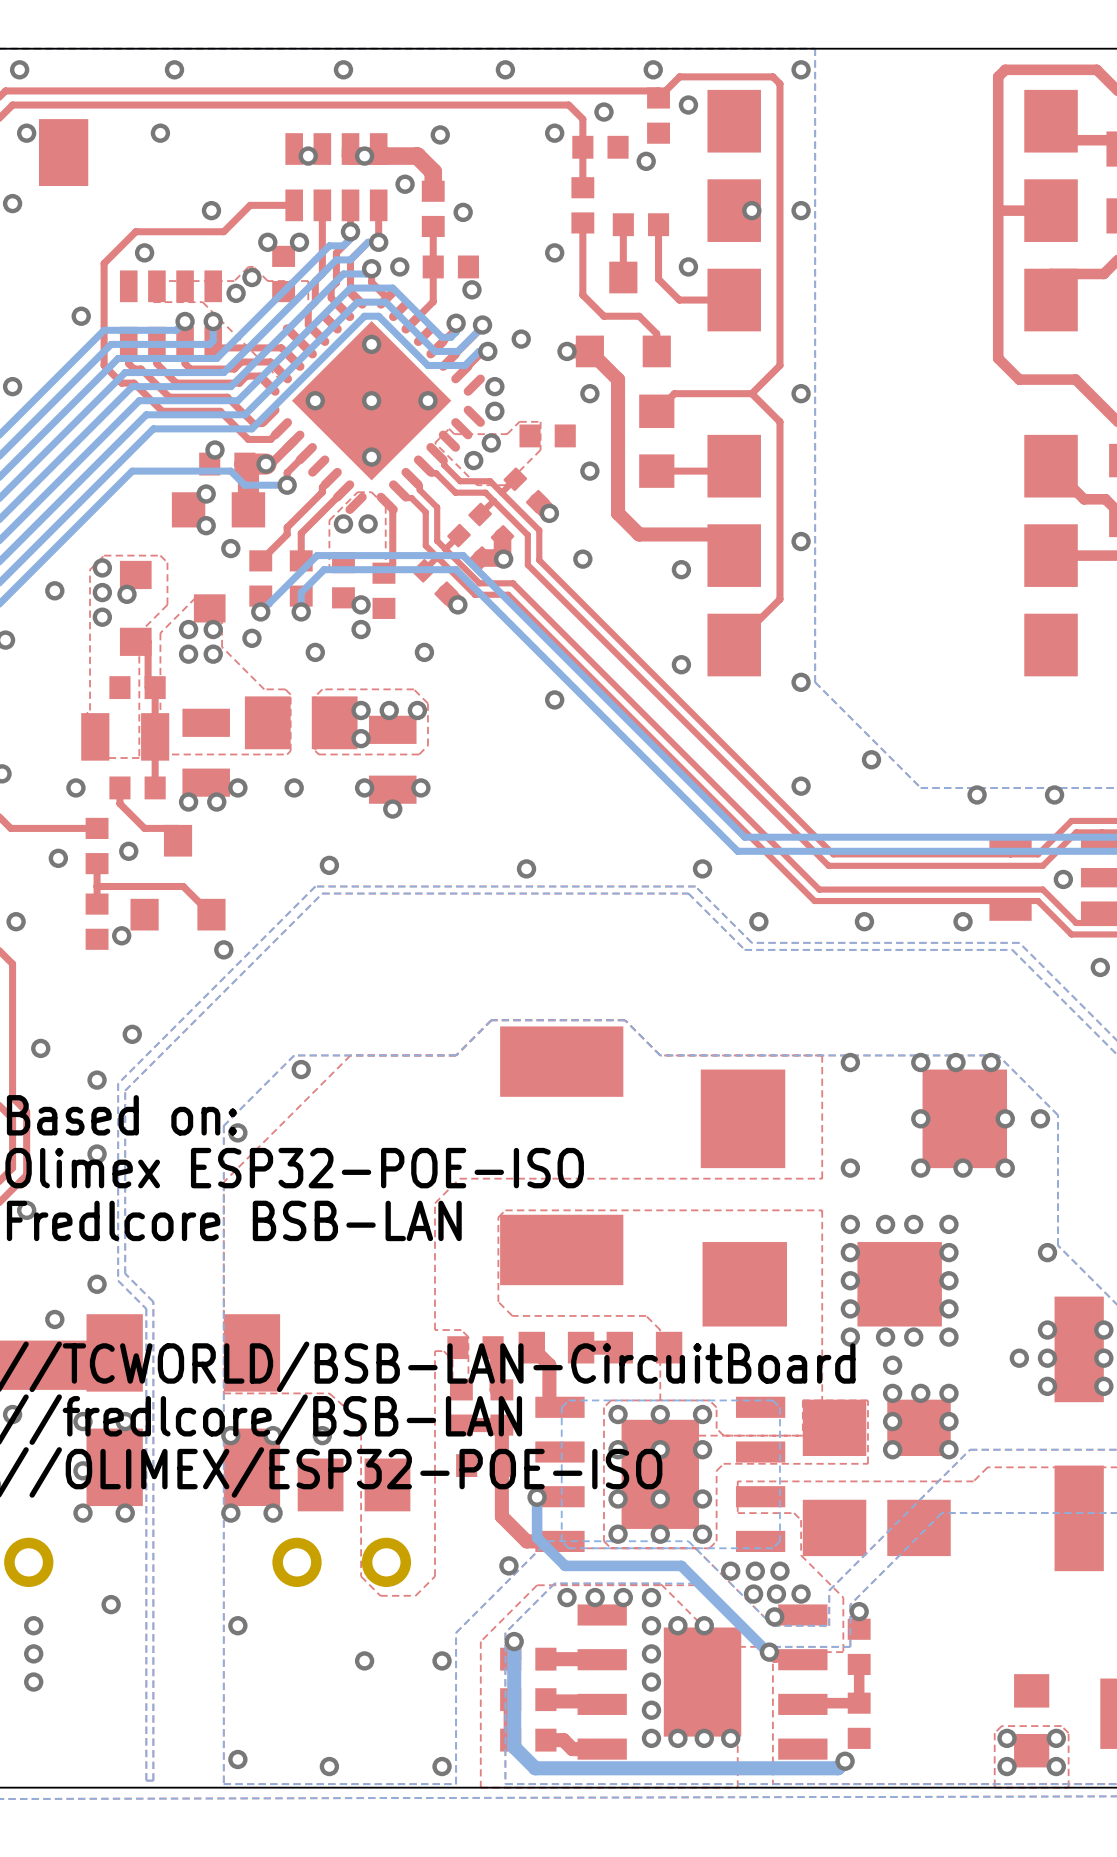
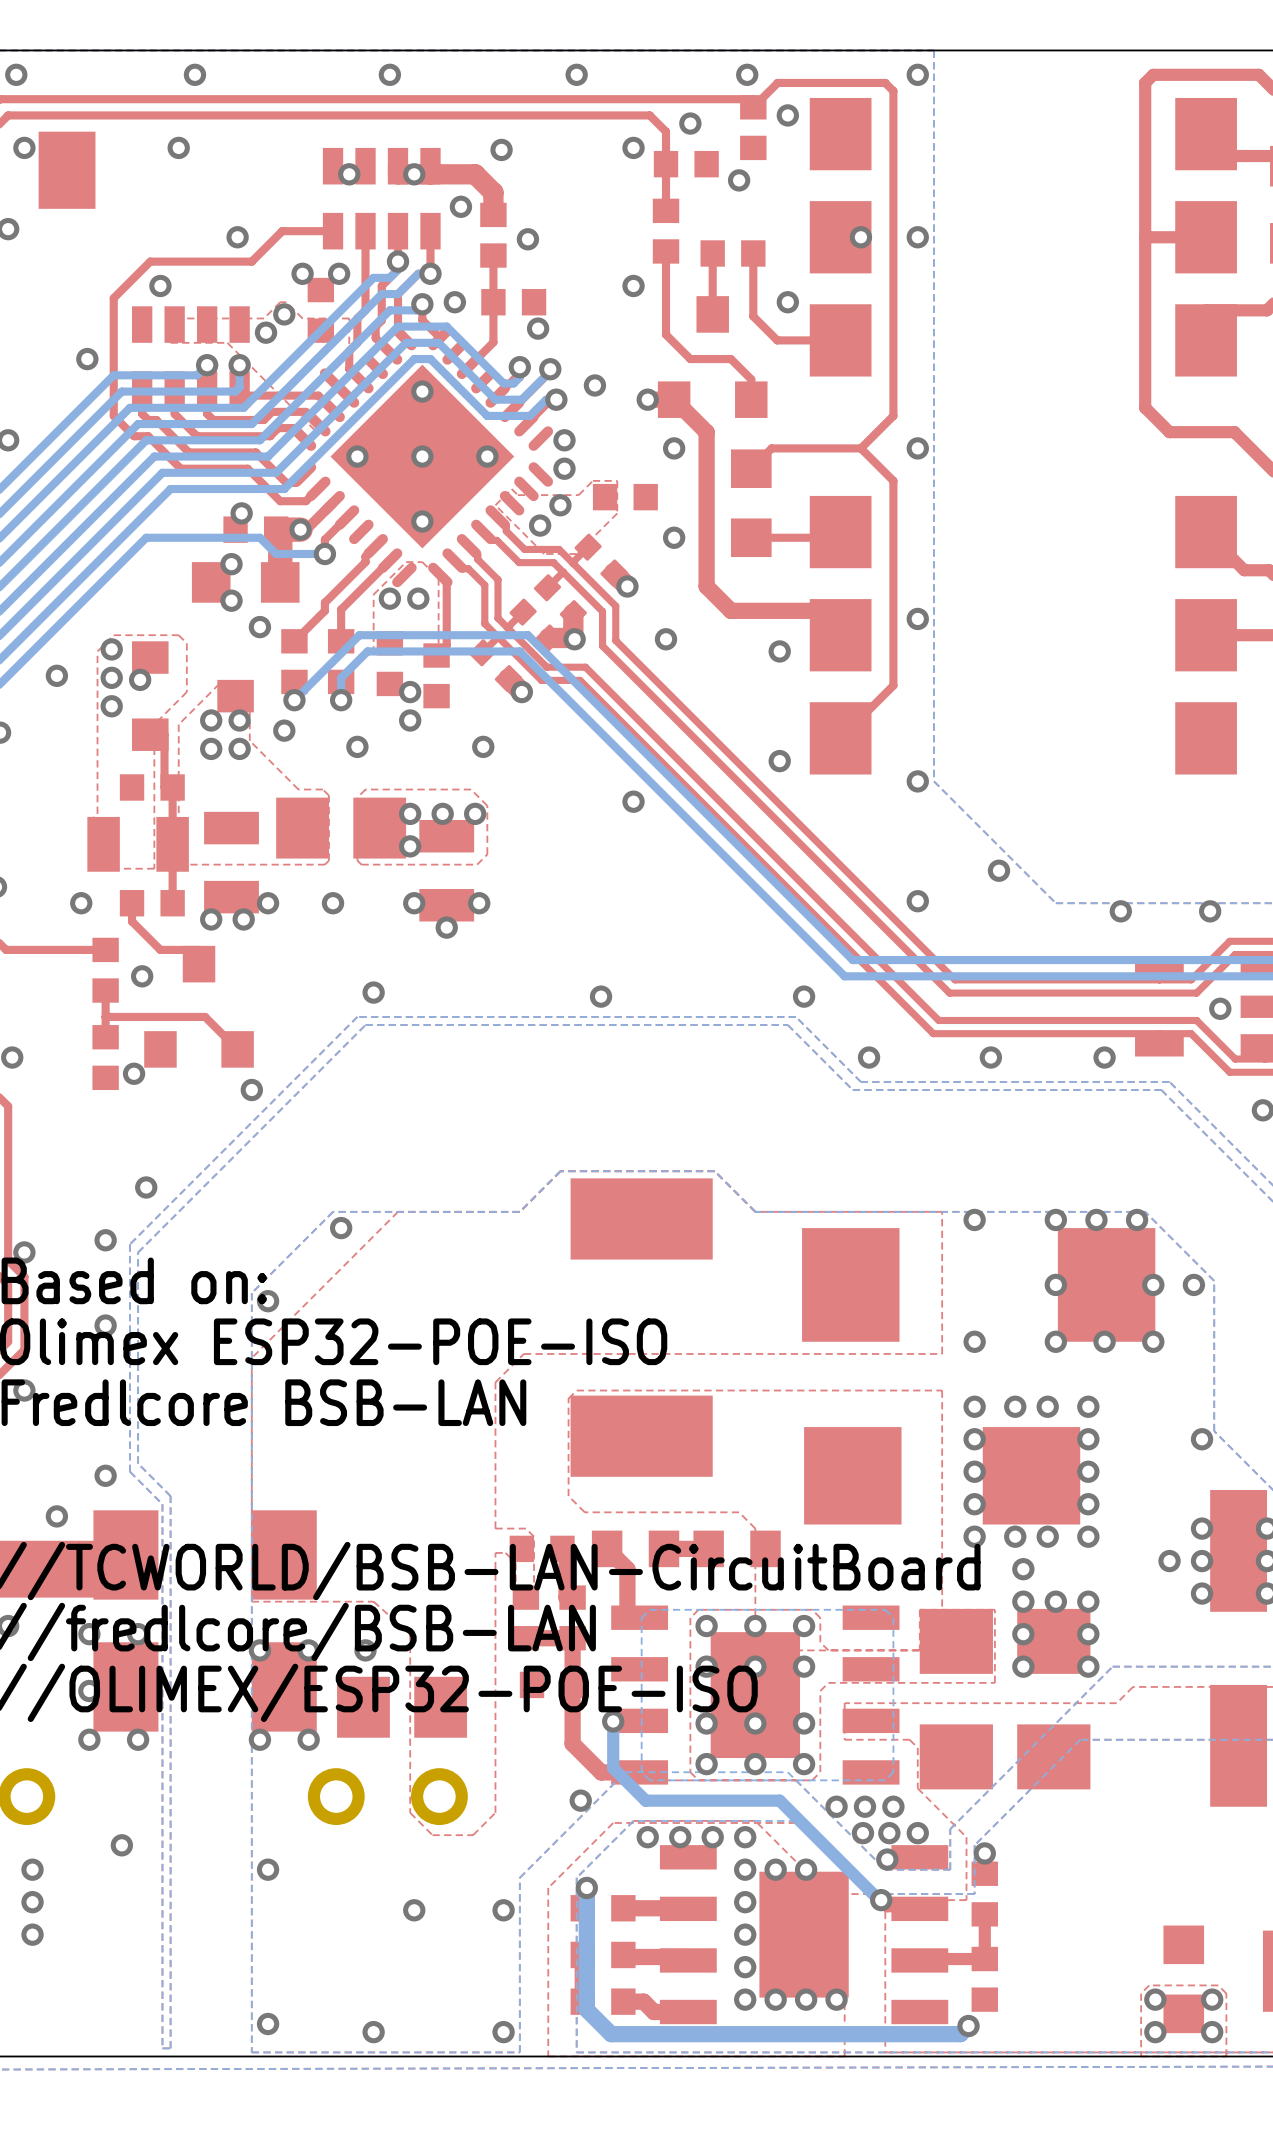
via: (58, 858) -> none
via position: (40, 1048) -> (24, 1252)

